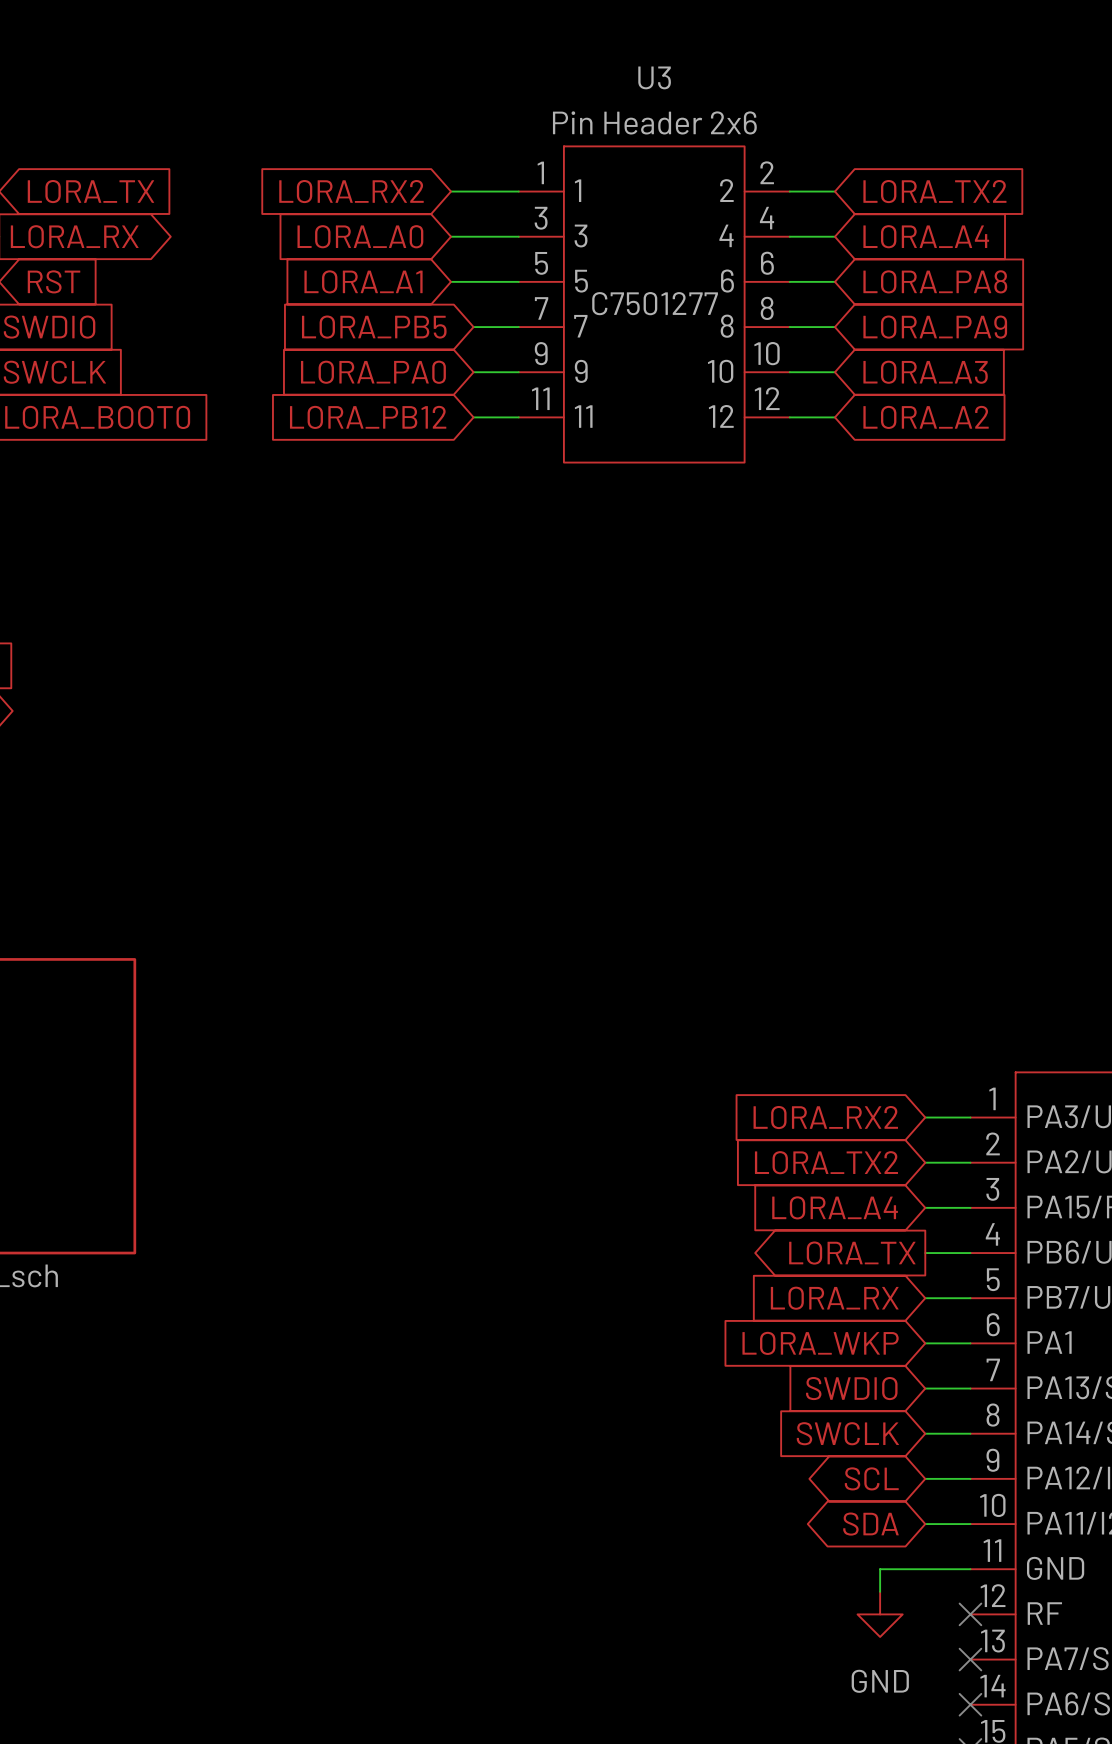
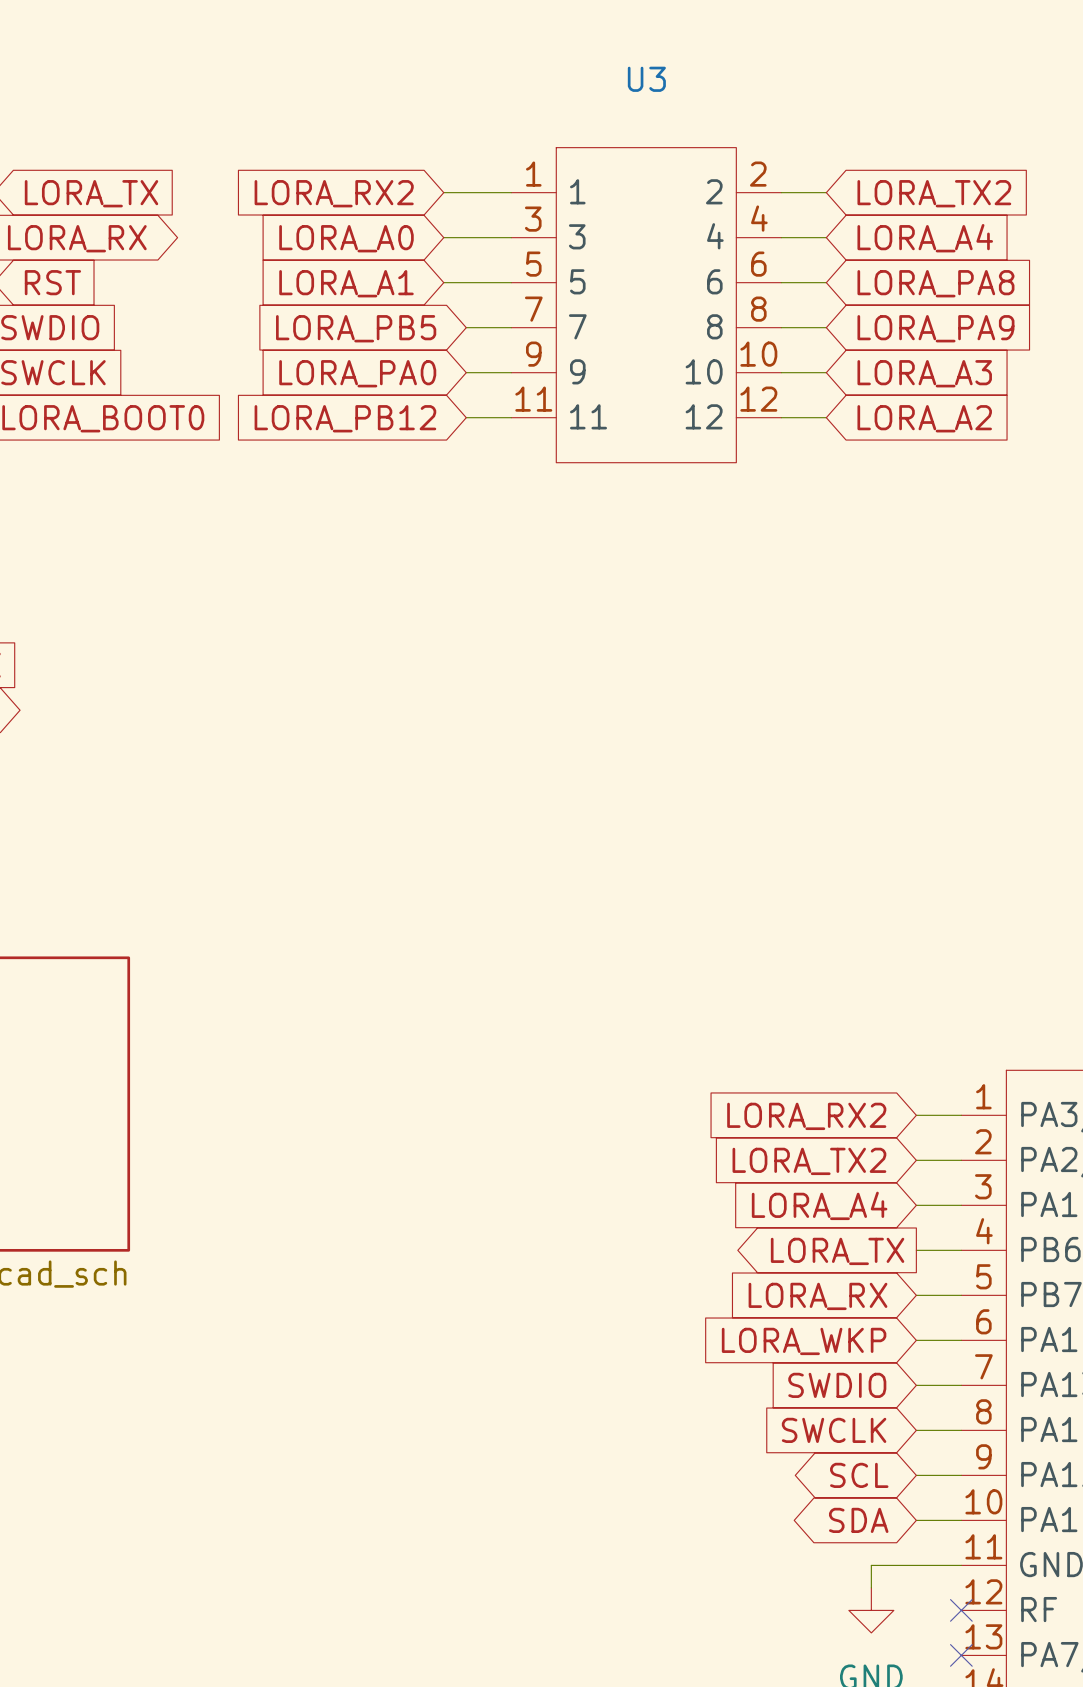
U3 value: Pin Header 2x6 (654, 122) -> none
U3 text: C7501277 (655, 303) -> none

